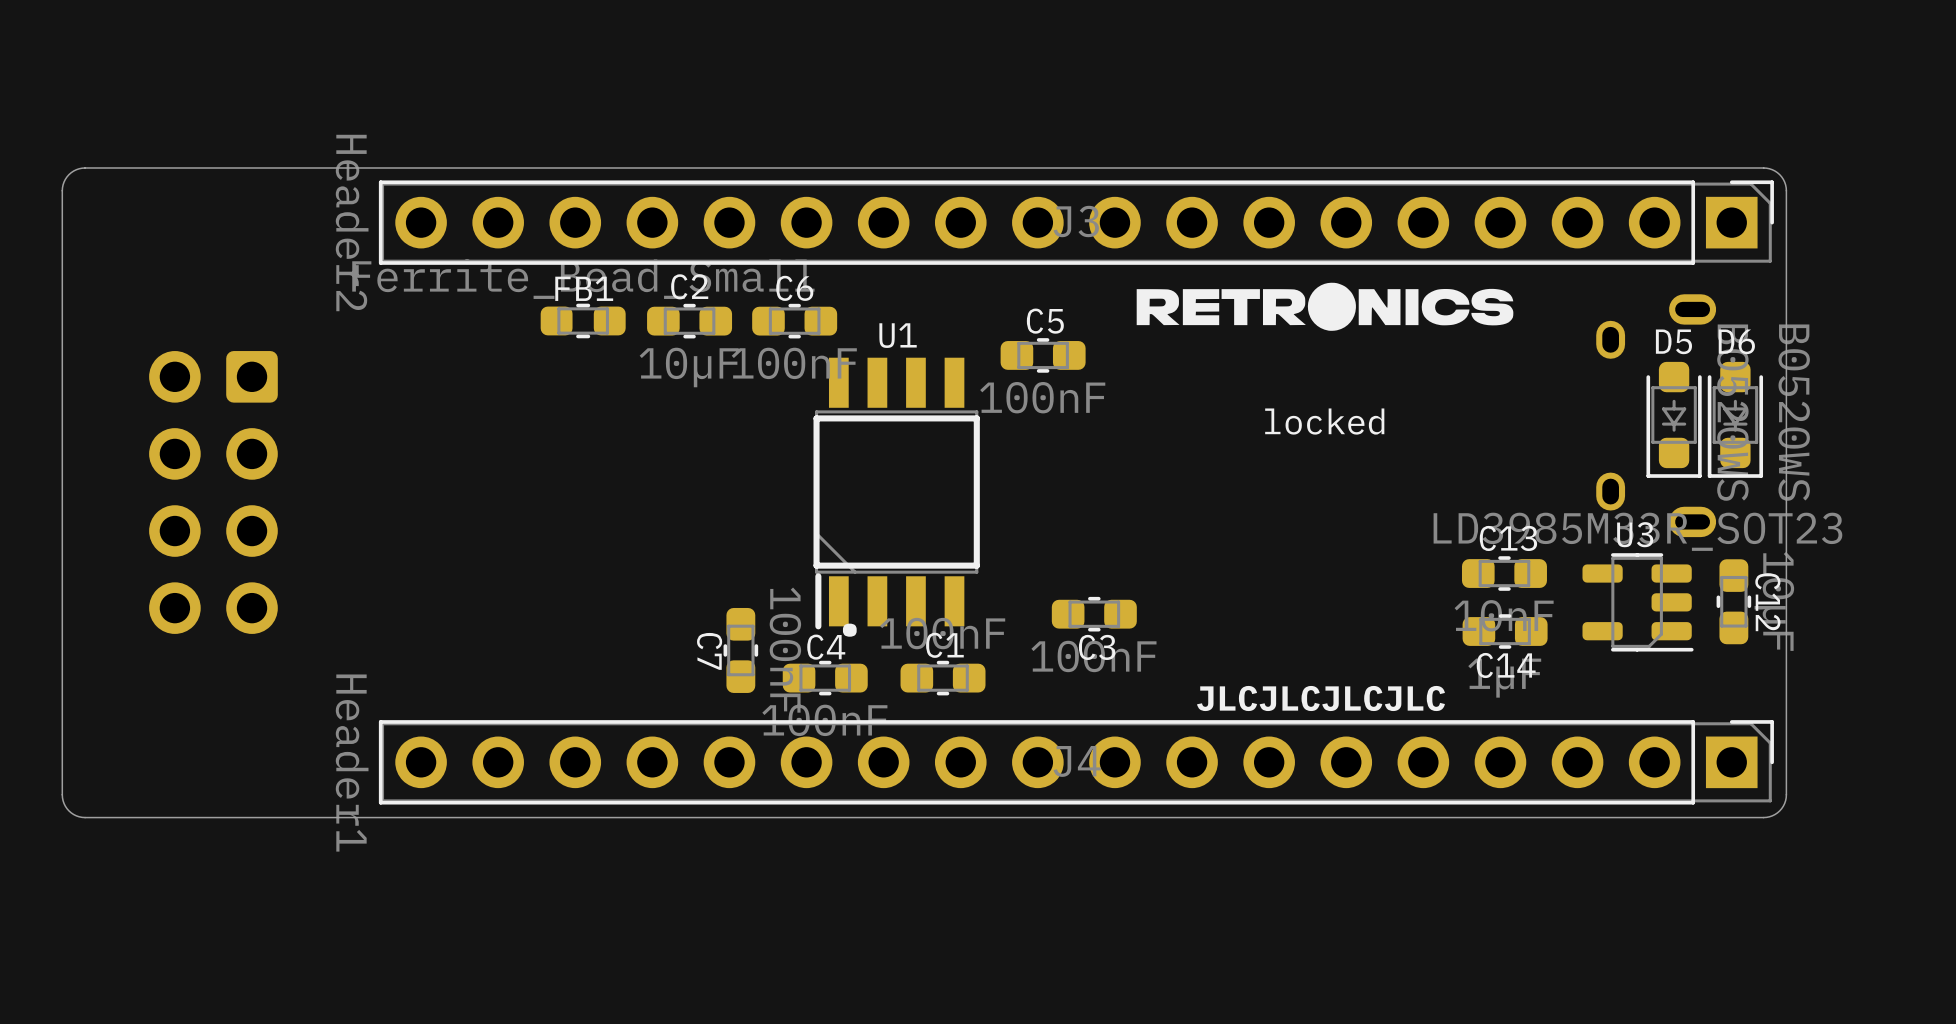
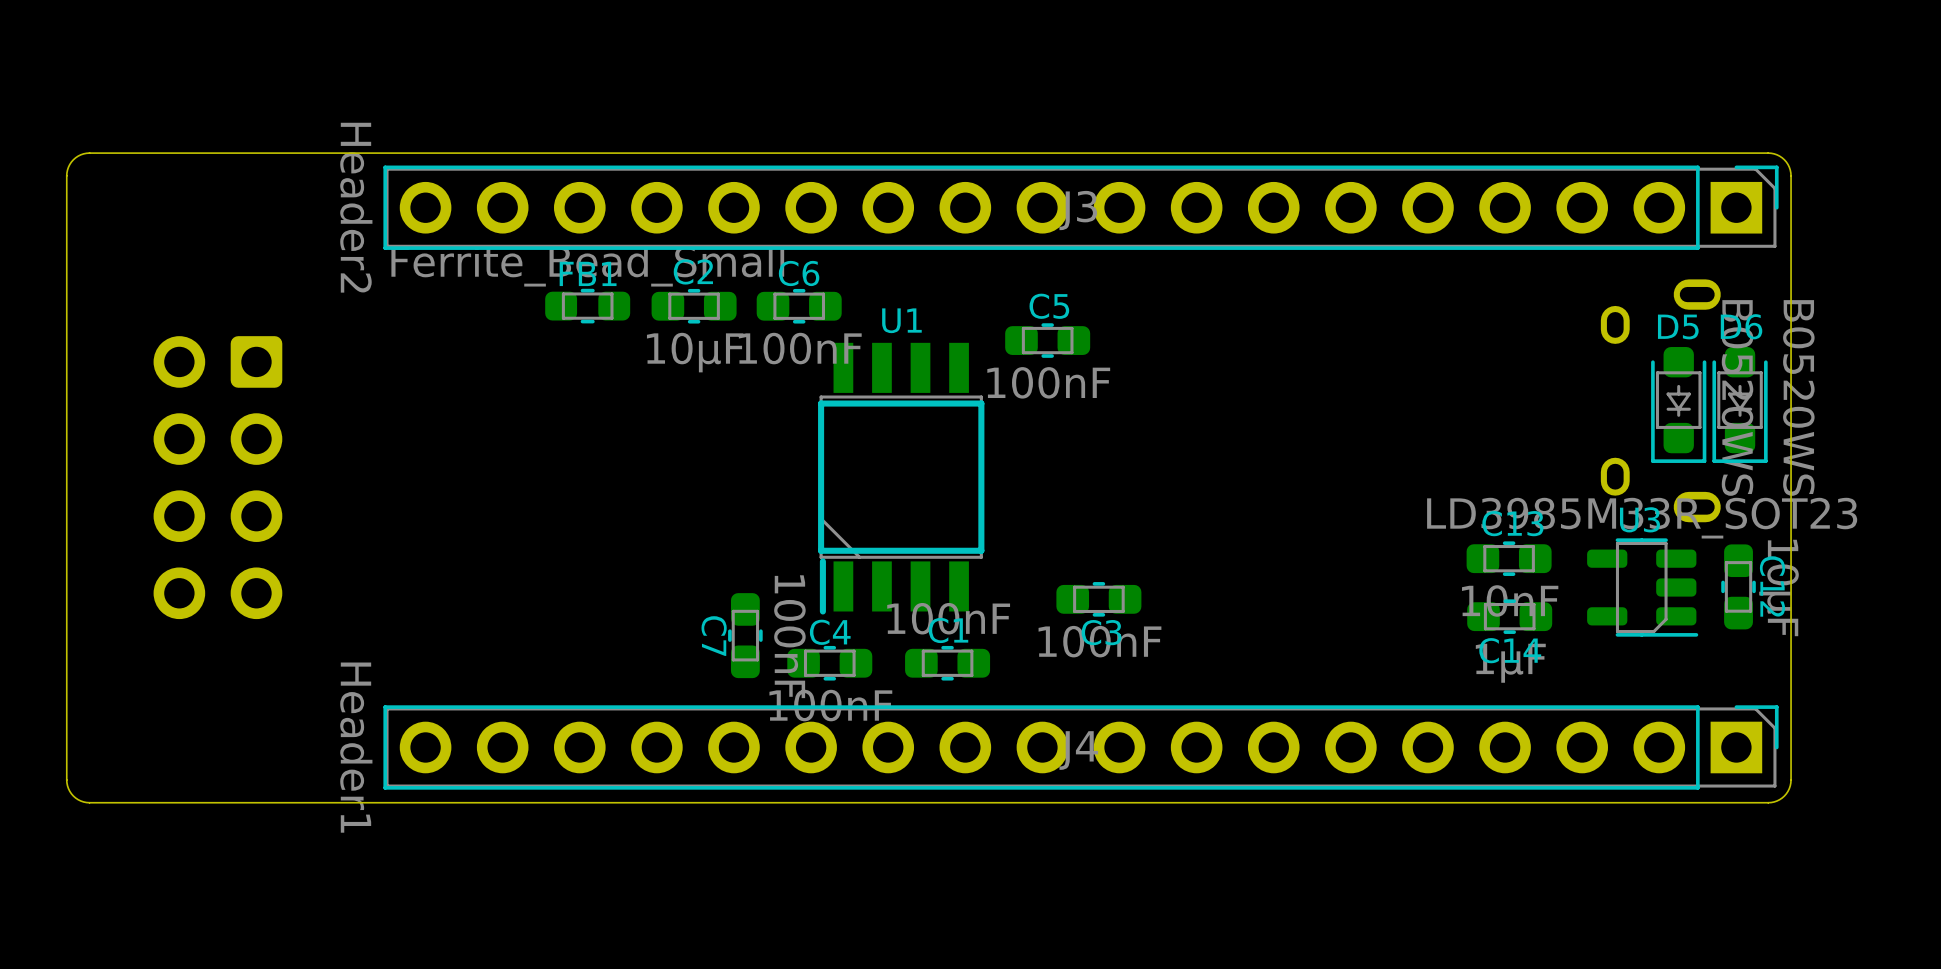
drawing: [1136, 282, 1514, 331] -> none
text: locked (1324, 421) -> none
text: . (849, 630) -> none
text: JLCJLCJLCJLC (1320, 698) -> none

